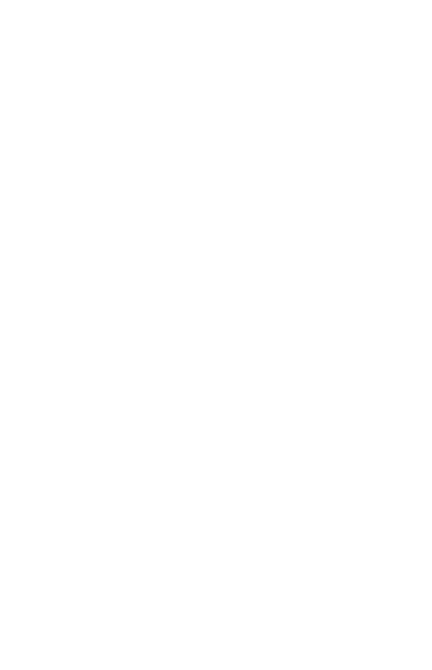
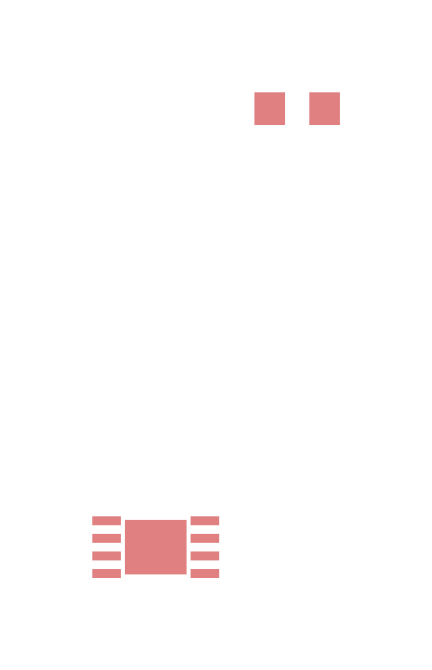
part: none -> (297, 108)
part: none -> (155, 547)

